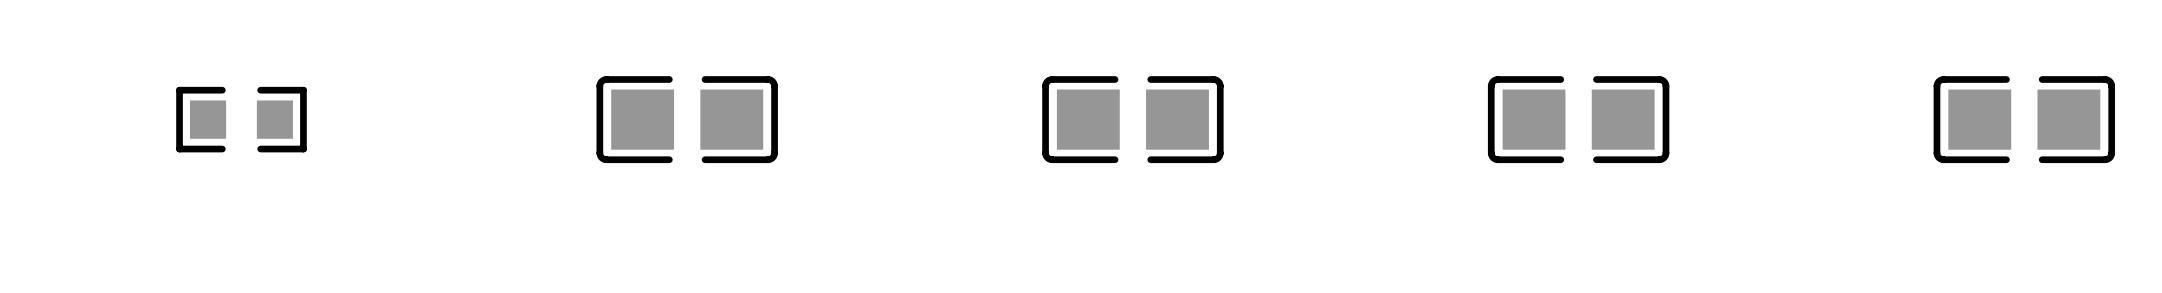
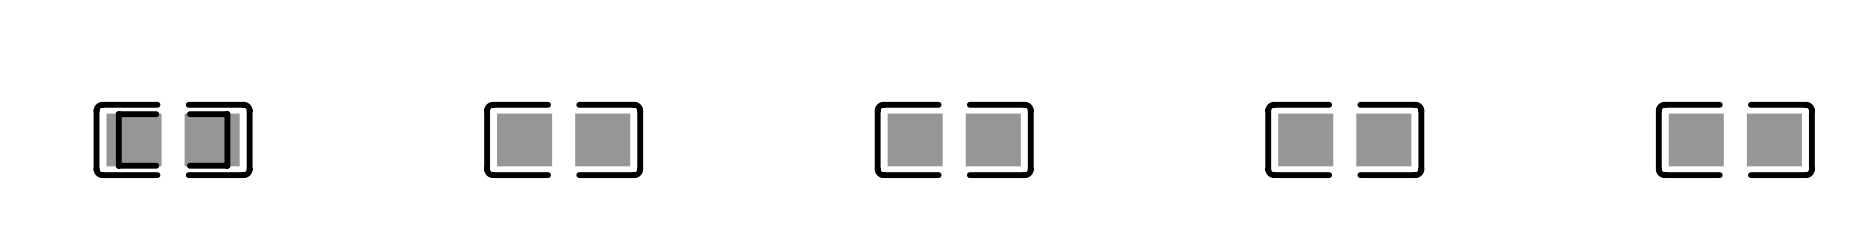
part: none -> (173, 139)

